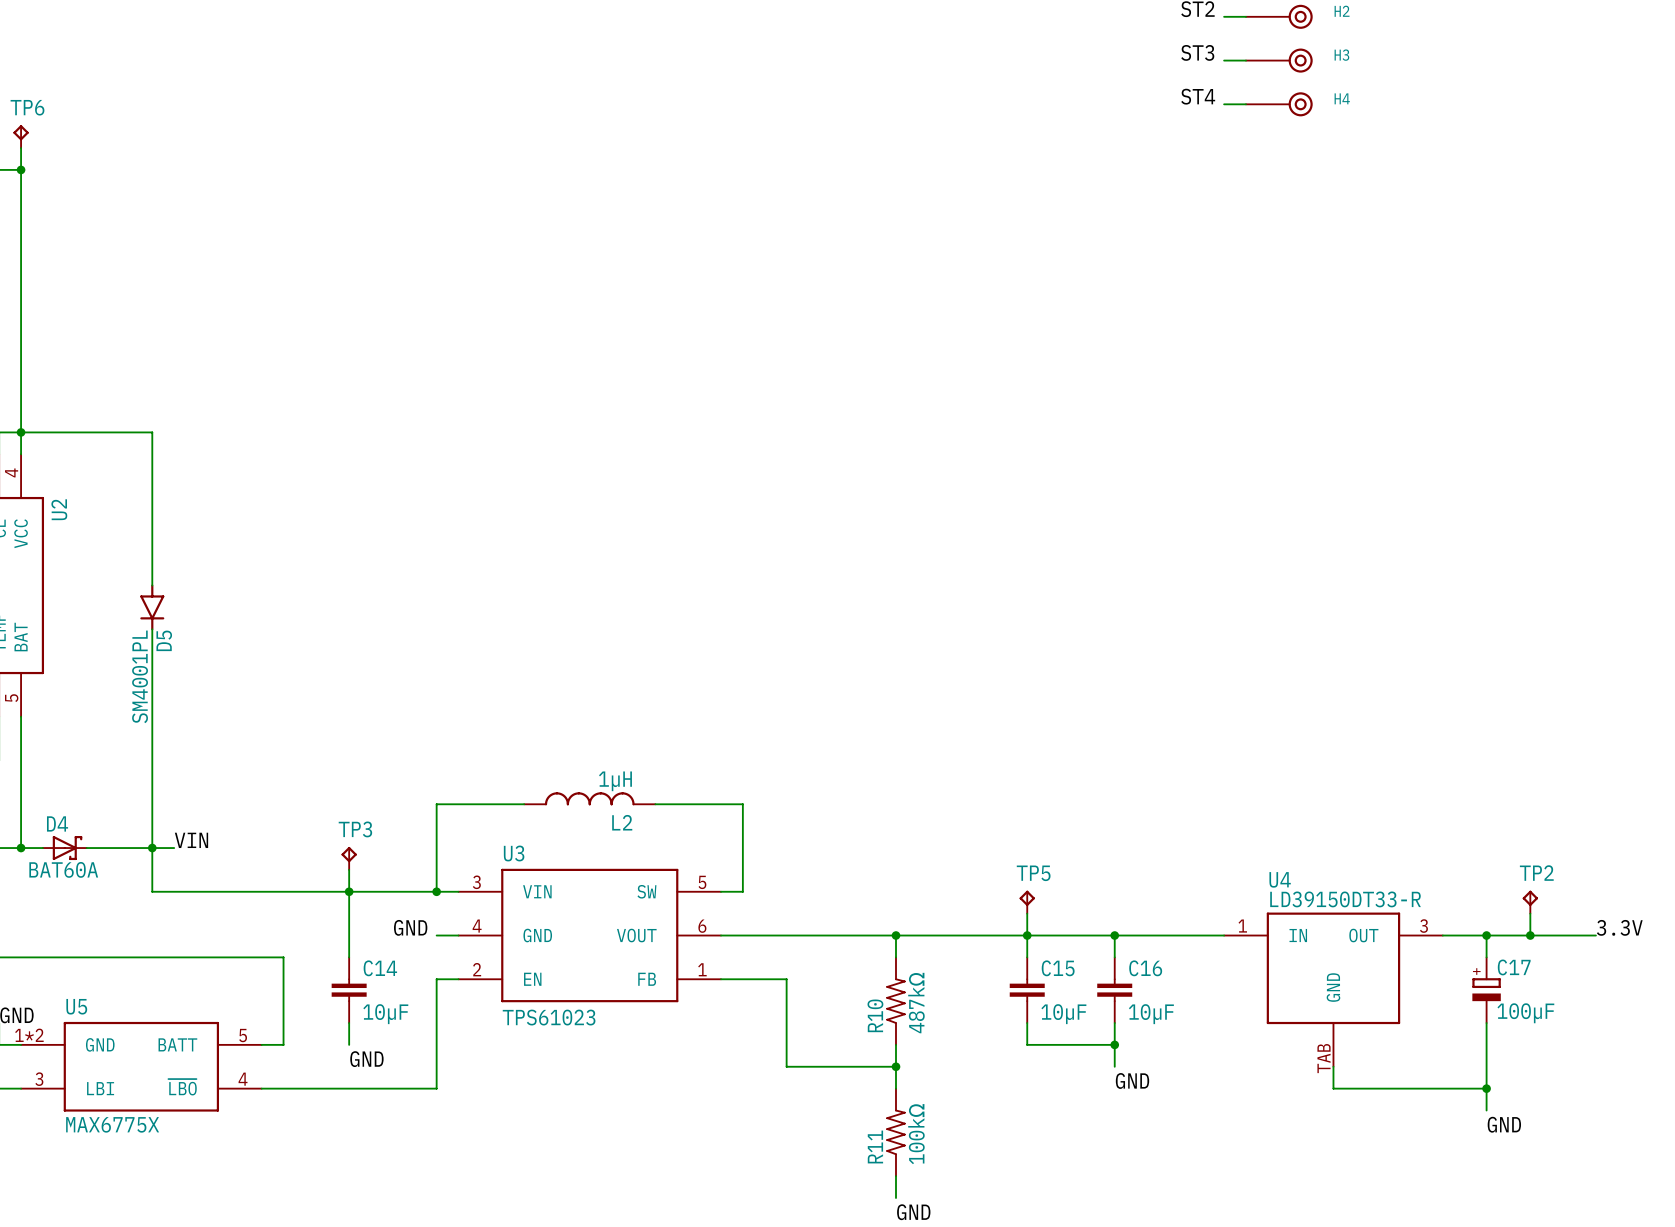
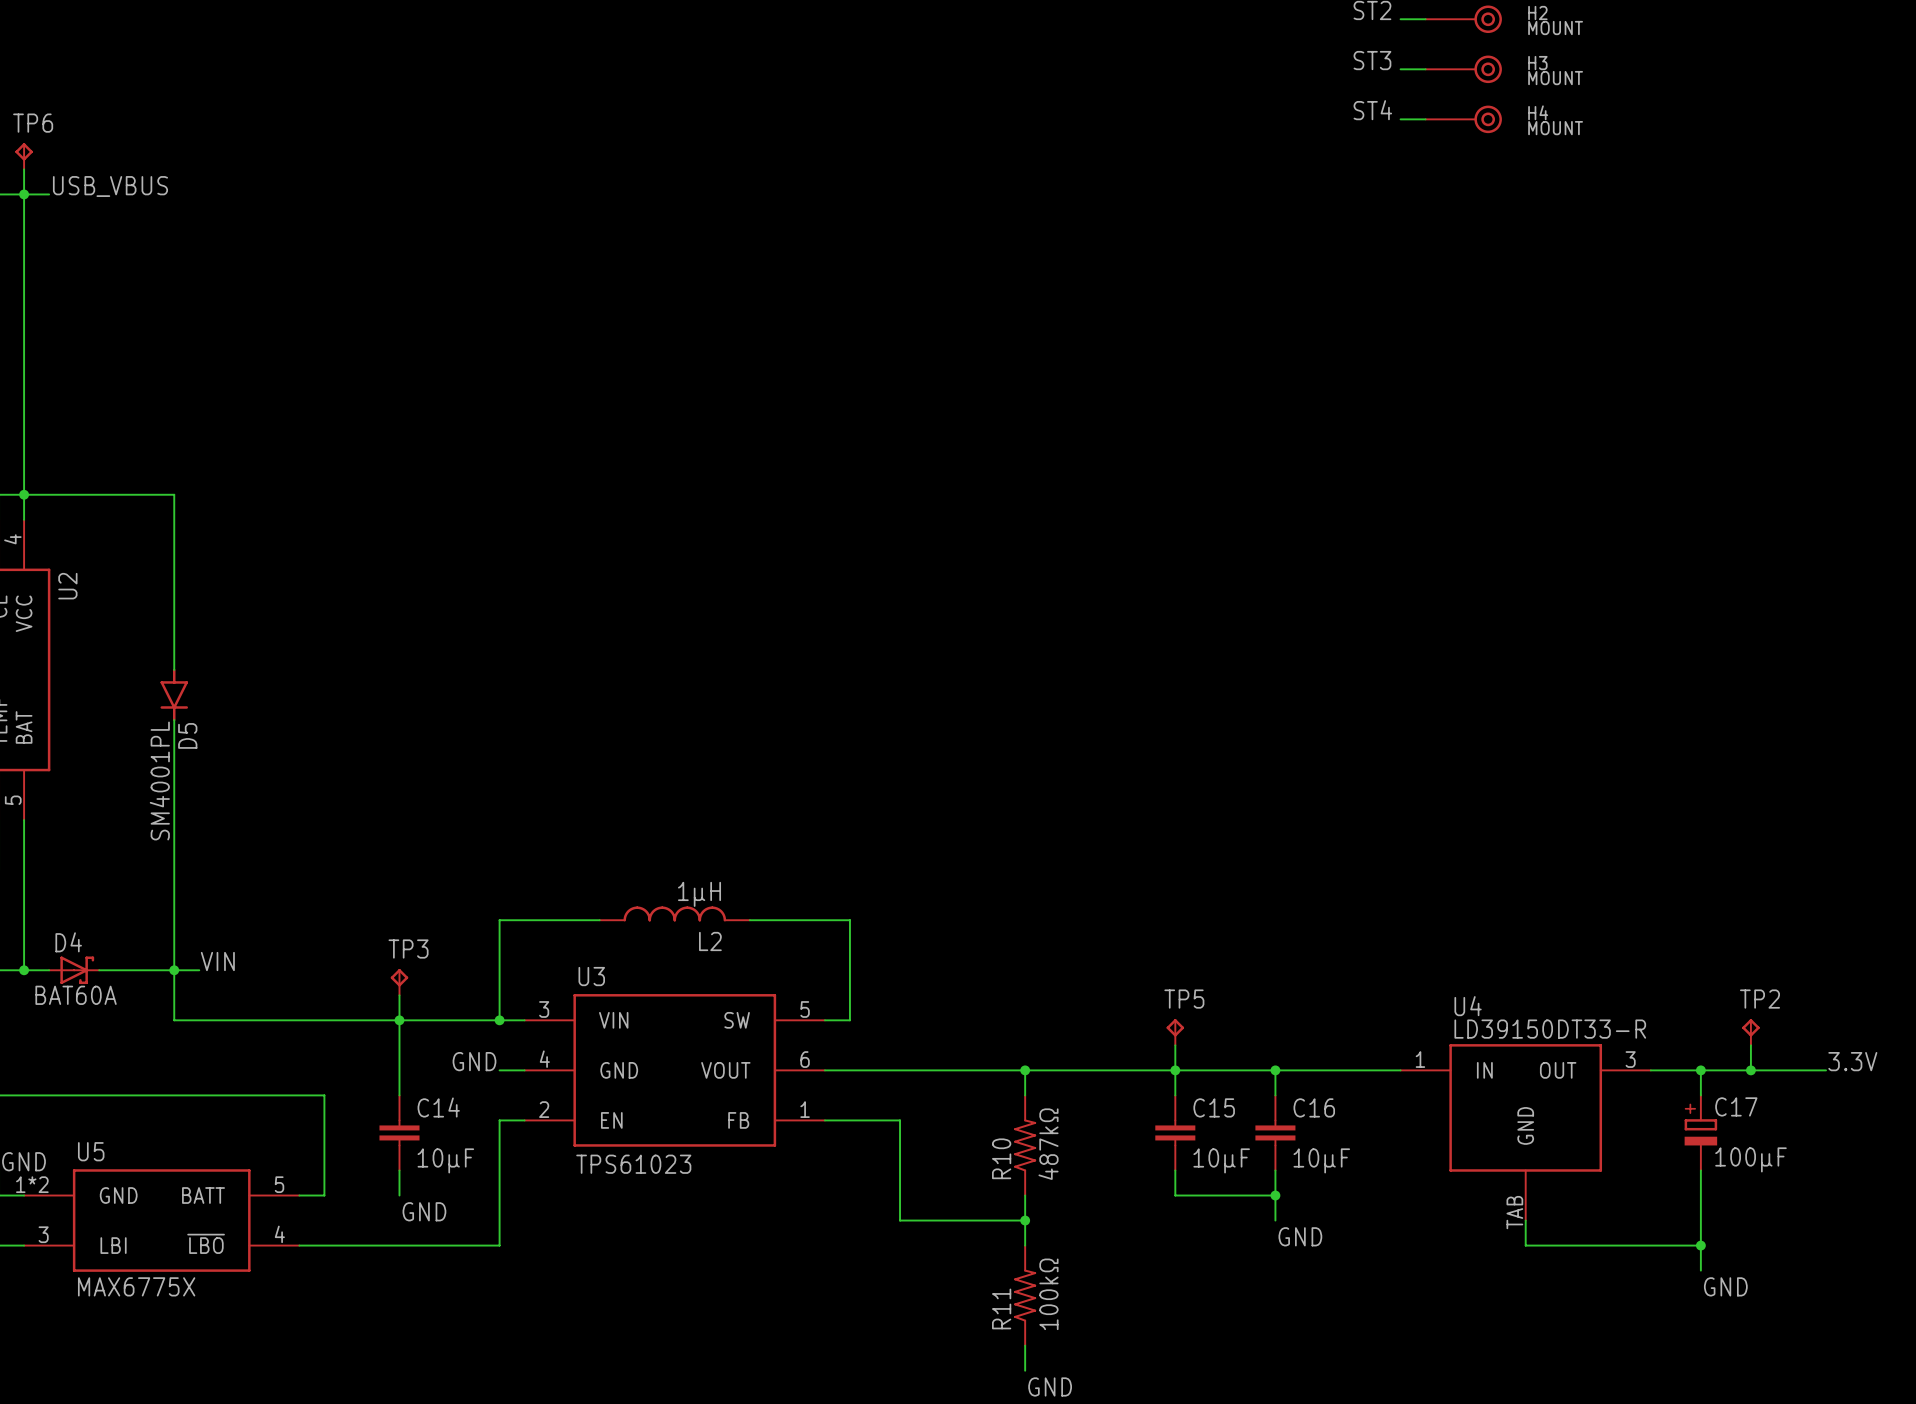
H2 value: none -> MOUNT (1555, 28)
H3 value: none -> MOUNT (1555, 78)
H4 value: none -> MOUNT (1555, 128)
label: none -> USB_VBUS (110, 186)
wire: none -> (24, 194) (49, 194)

